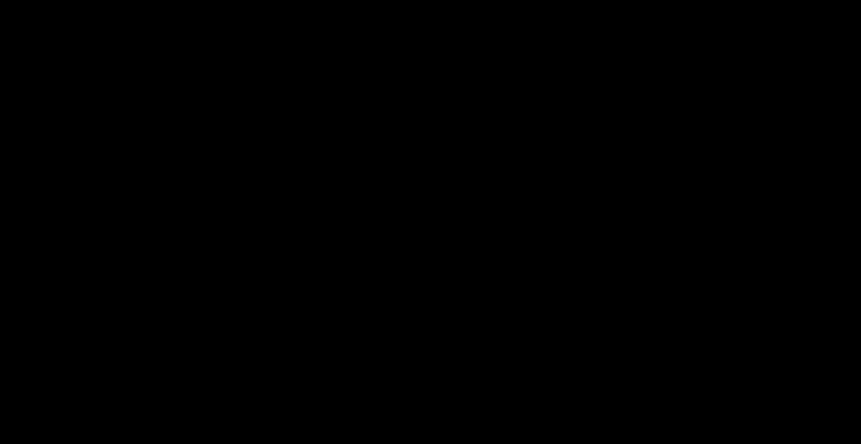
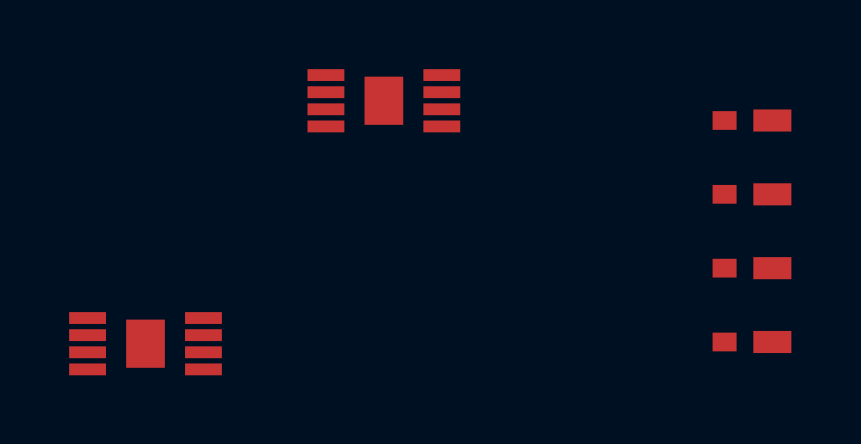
part: none -> (383, 100)
part: none -> (751, 120)
part: none -> (751, 194)
part: none -> (751, 268)
part: none -> (751, 342)
part: none -> (145, 343)

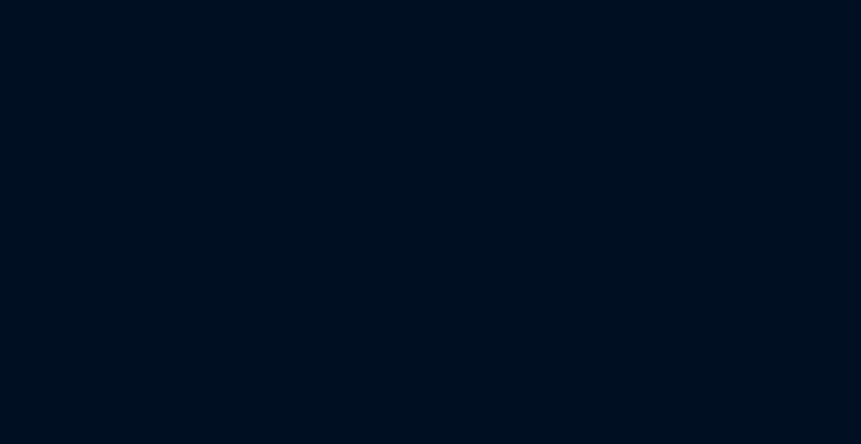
part: (383, 100) -> none
part: (751, 120) -> none
part: (751, 194) -> none
part: (751, 268) -> none
part: (751, 342) -> none
part: (145, 343) -> none

